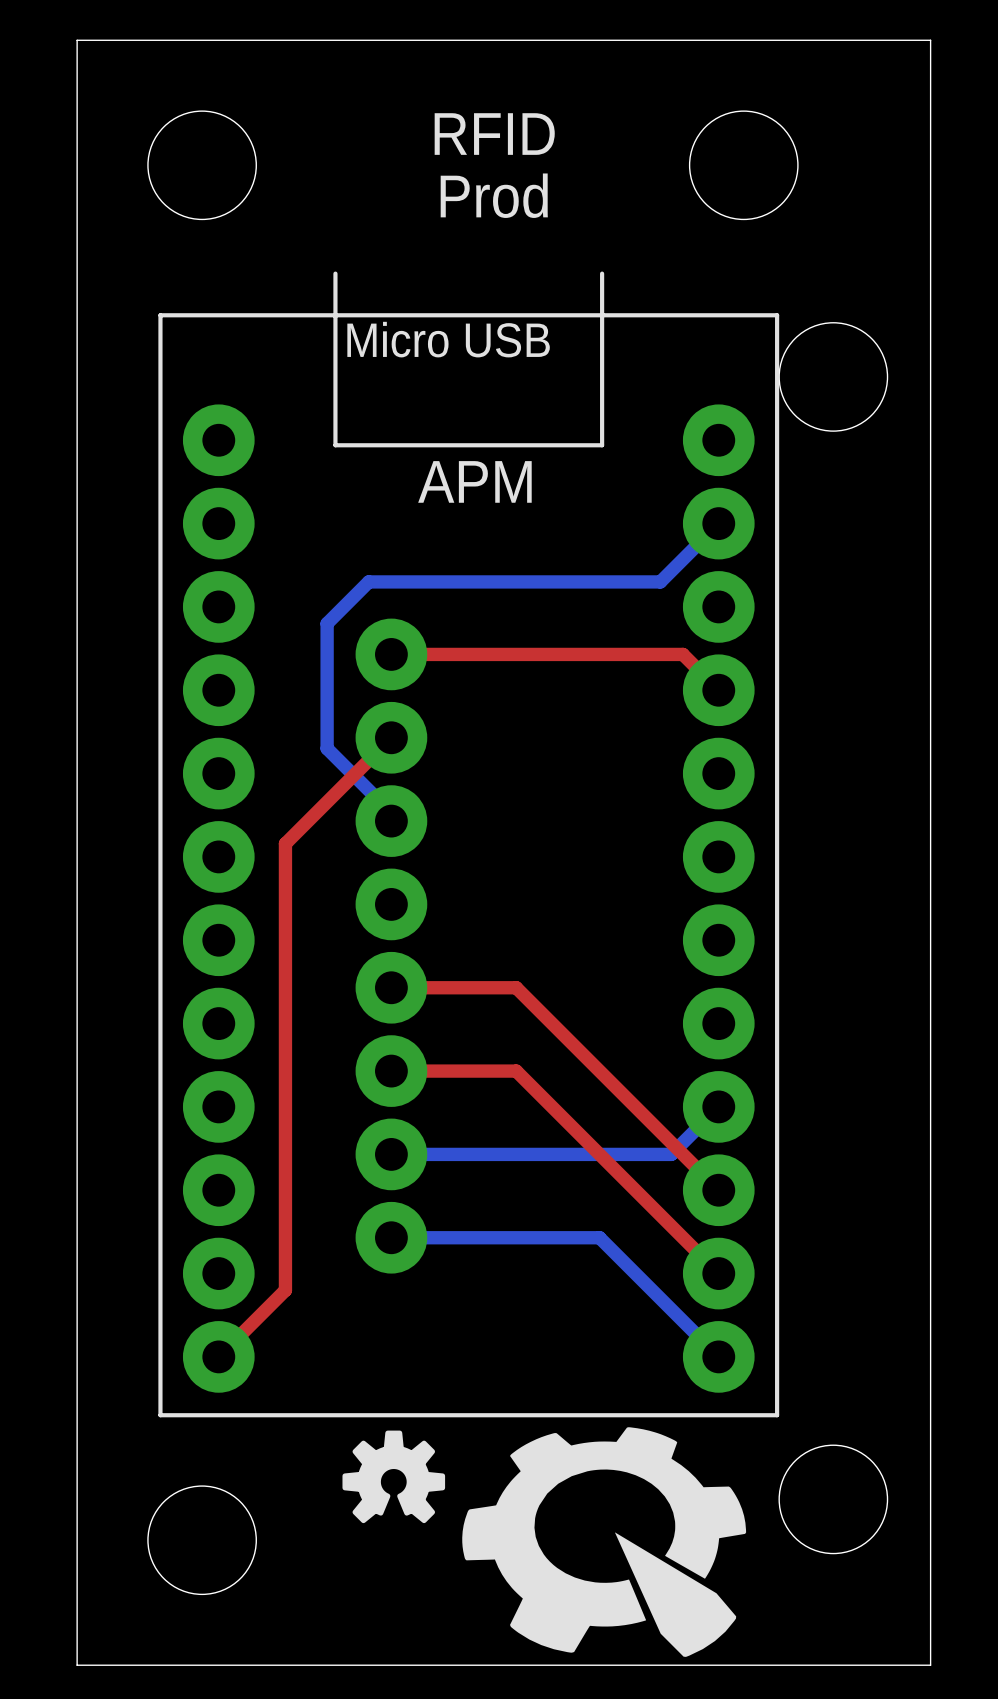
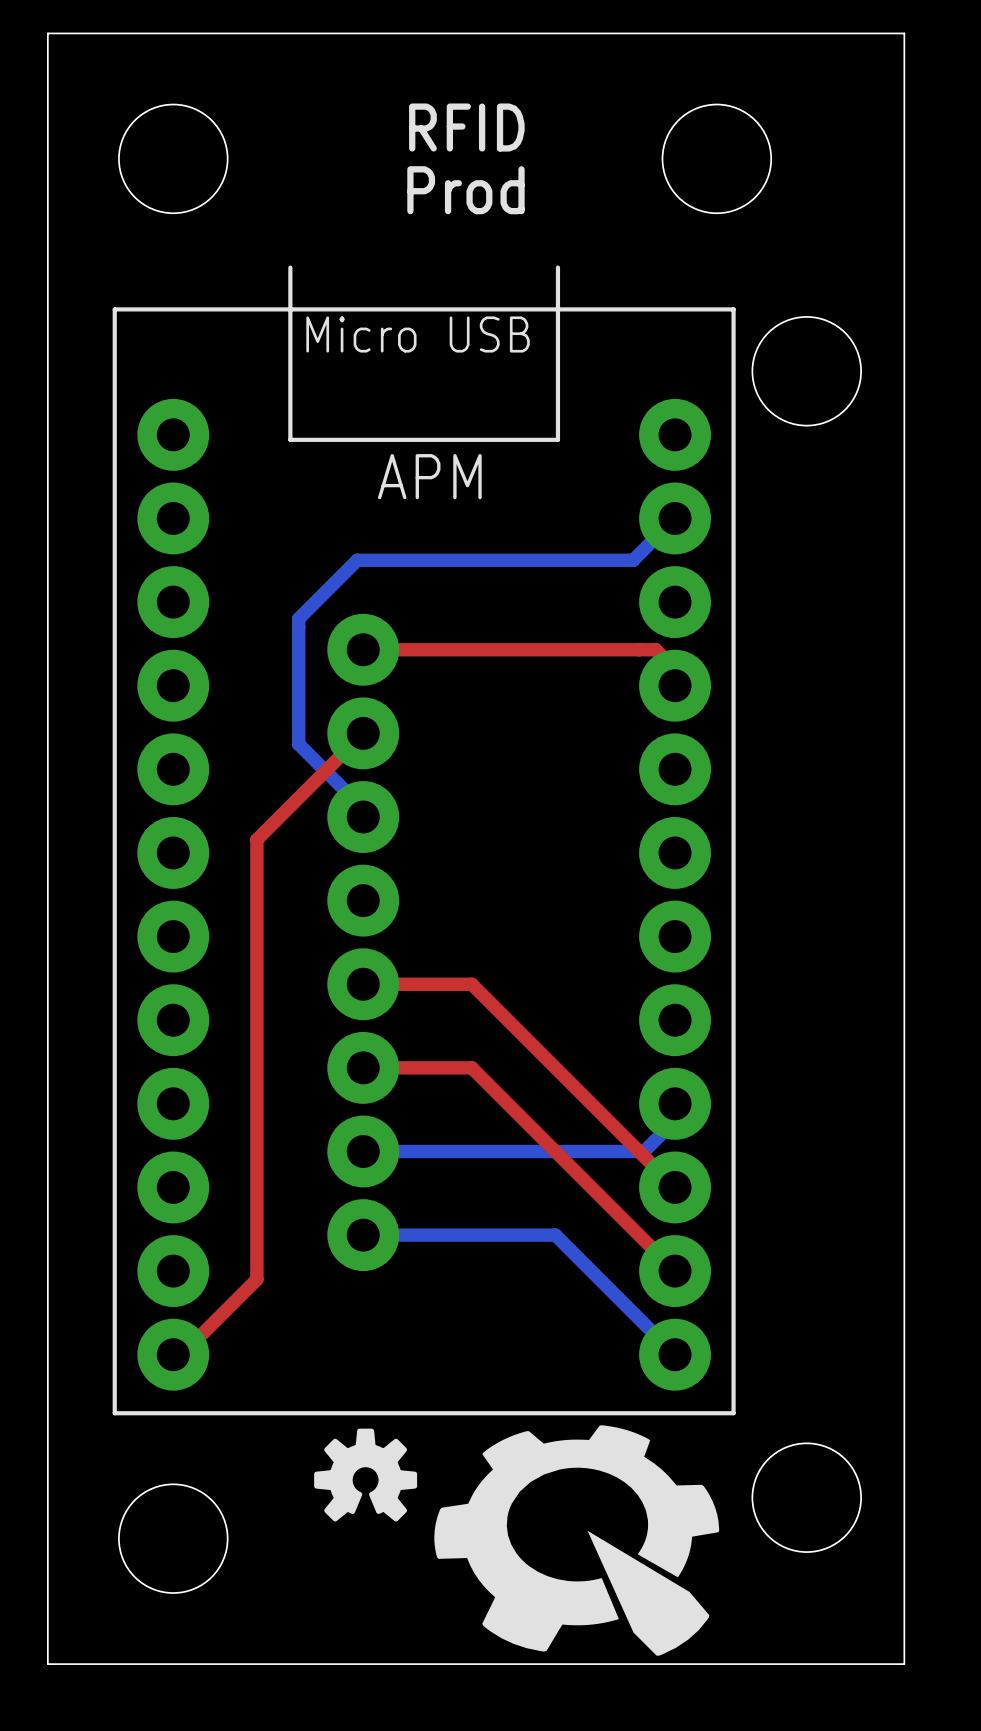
bottom track: (718, 523) (660, 581) (368, 581) -> (675, 518) (633, 560) (357, 560) (340, 576)
APM position: (468, 844) -> (424, 840)
top track: (499, 987) (516, 987) (718, 1190) -> (471, 984) (675, 1187)
top track: (499, 1071) (516, 1071) (718, 1273) -> (471, 1067) (675, 1271)
bottom track: (582, 1237) (599, 1237) (718, 1356) -> (555, 1235) (675, 1354)
top track: (285, 1281) (285, 1290) (218, 1356) -> (256, 1279) (181, 1354) (173, 1354)

